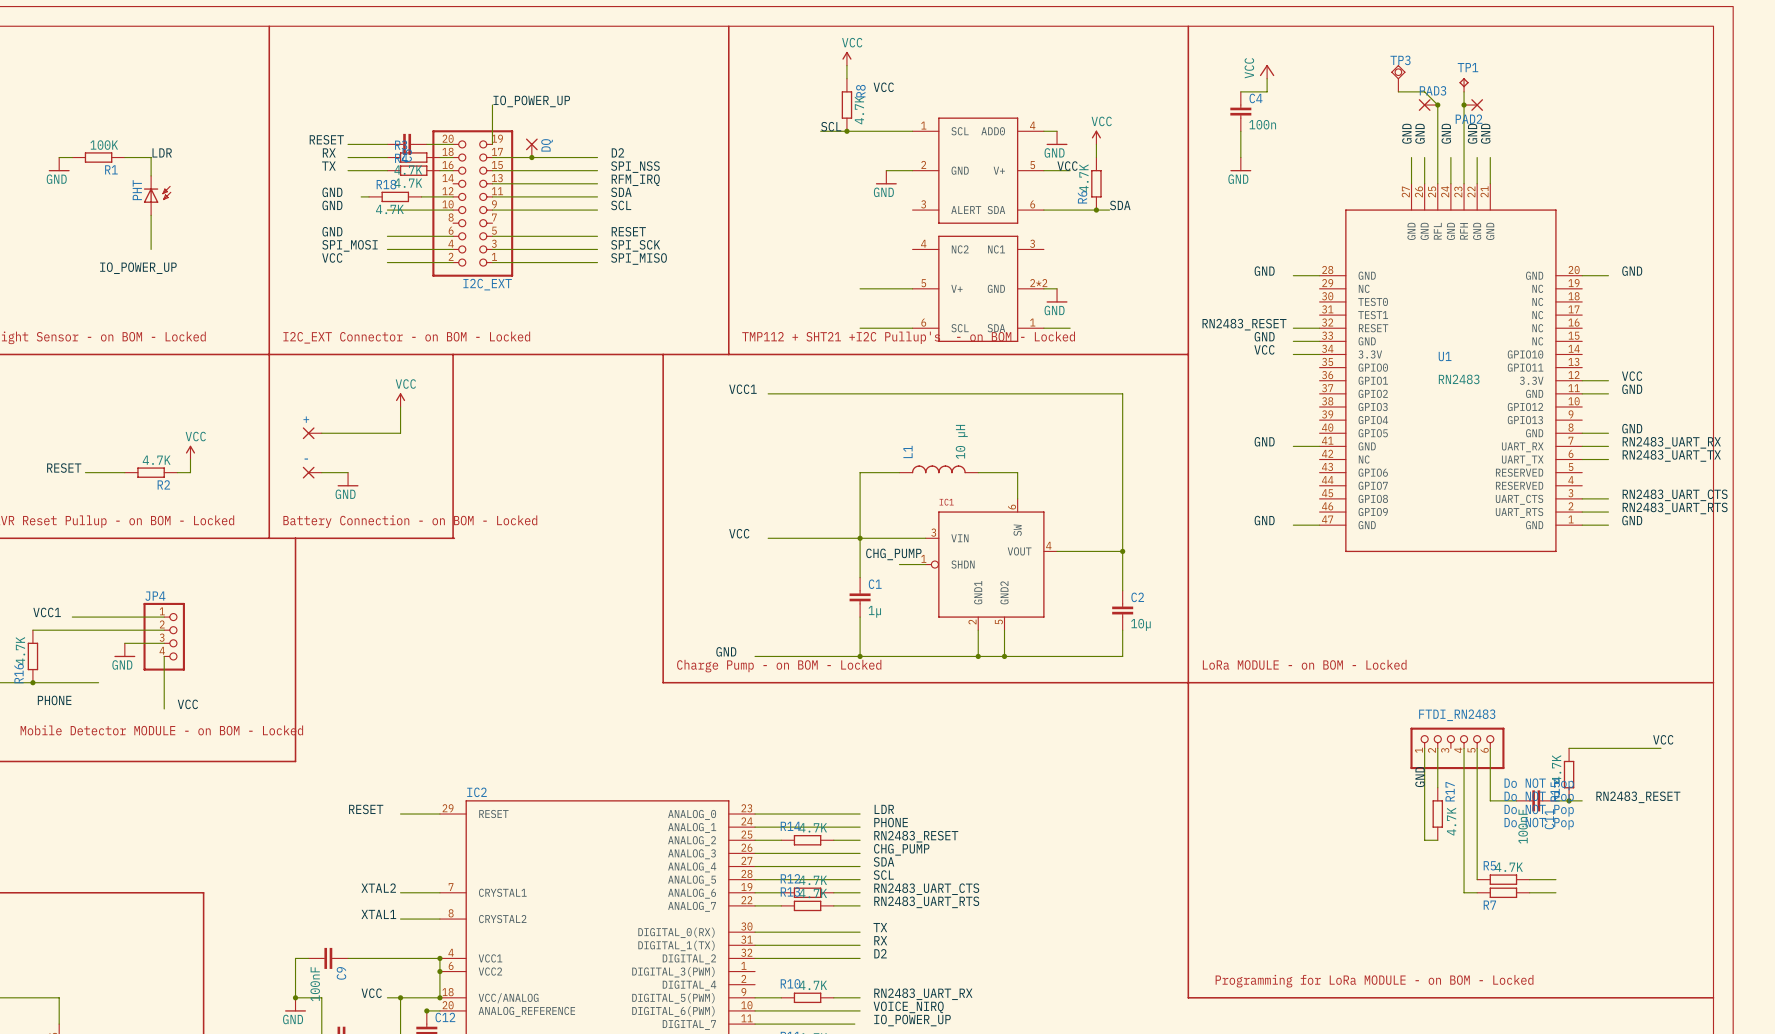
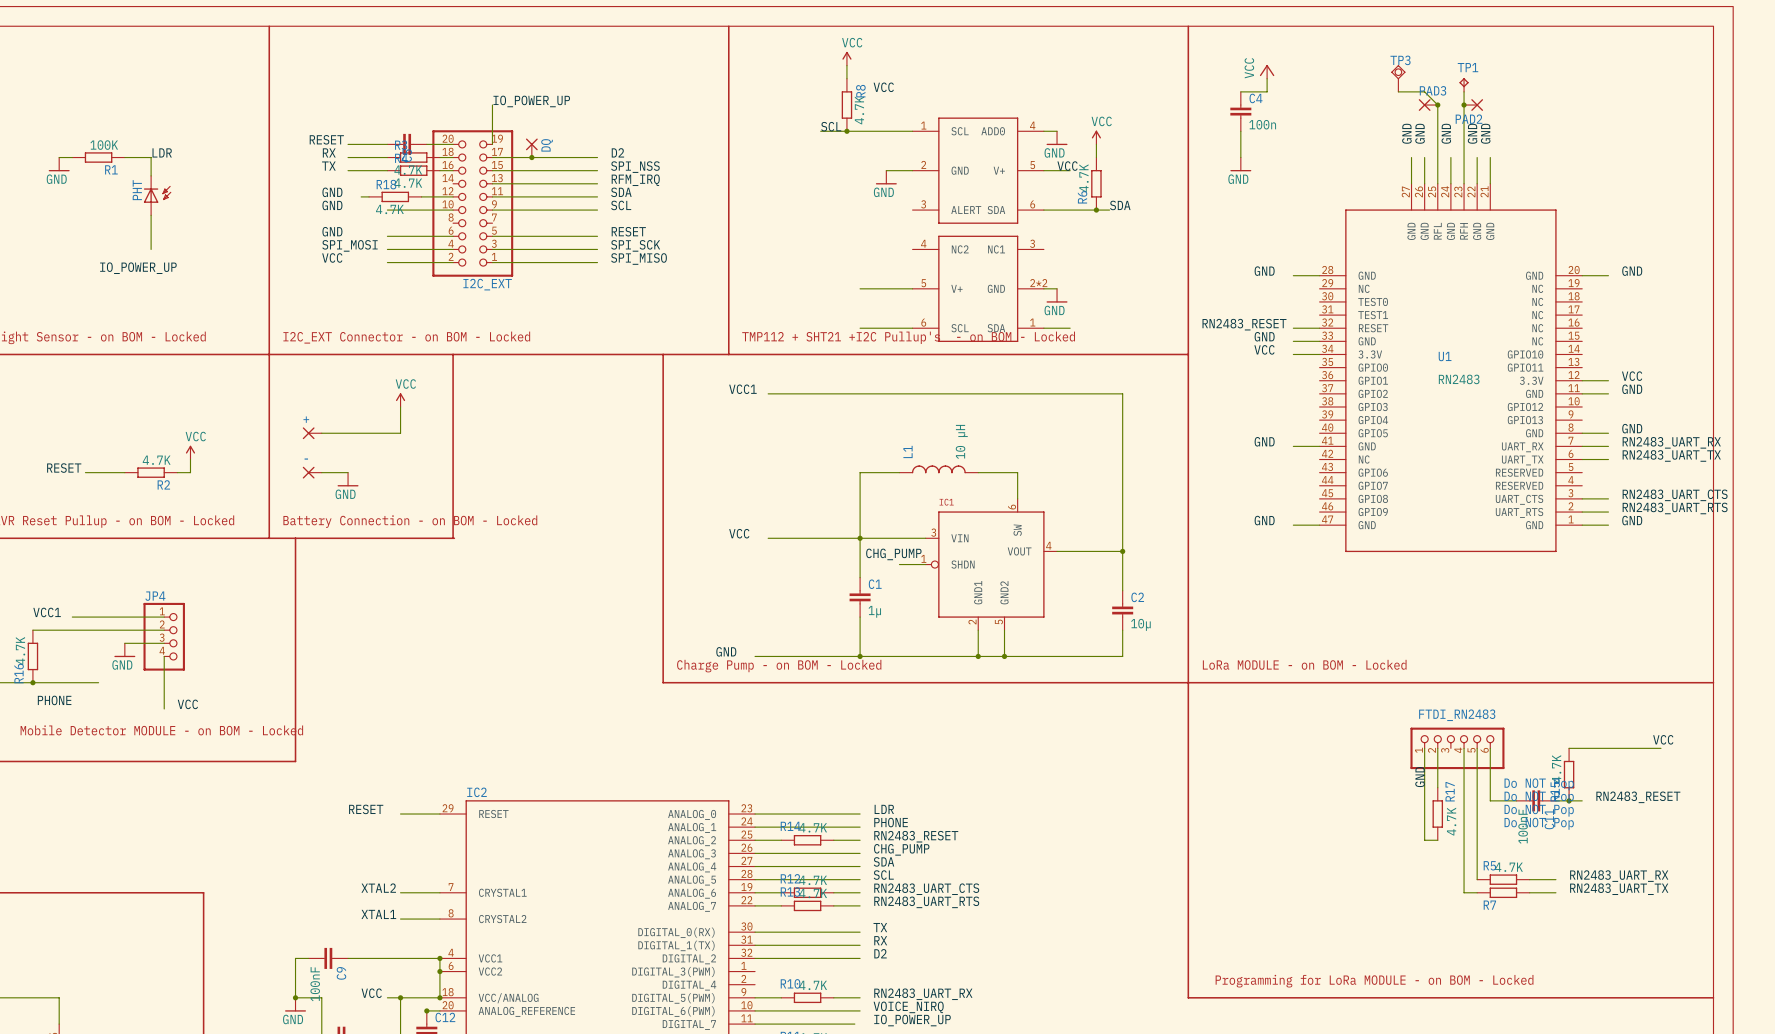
label: none -> RN2483_UART_RX (1619, 876)
label: none -> RN2483_UART_TX (1619, 889)

